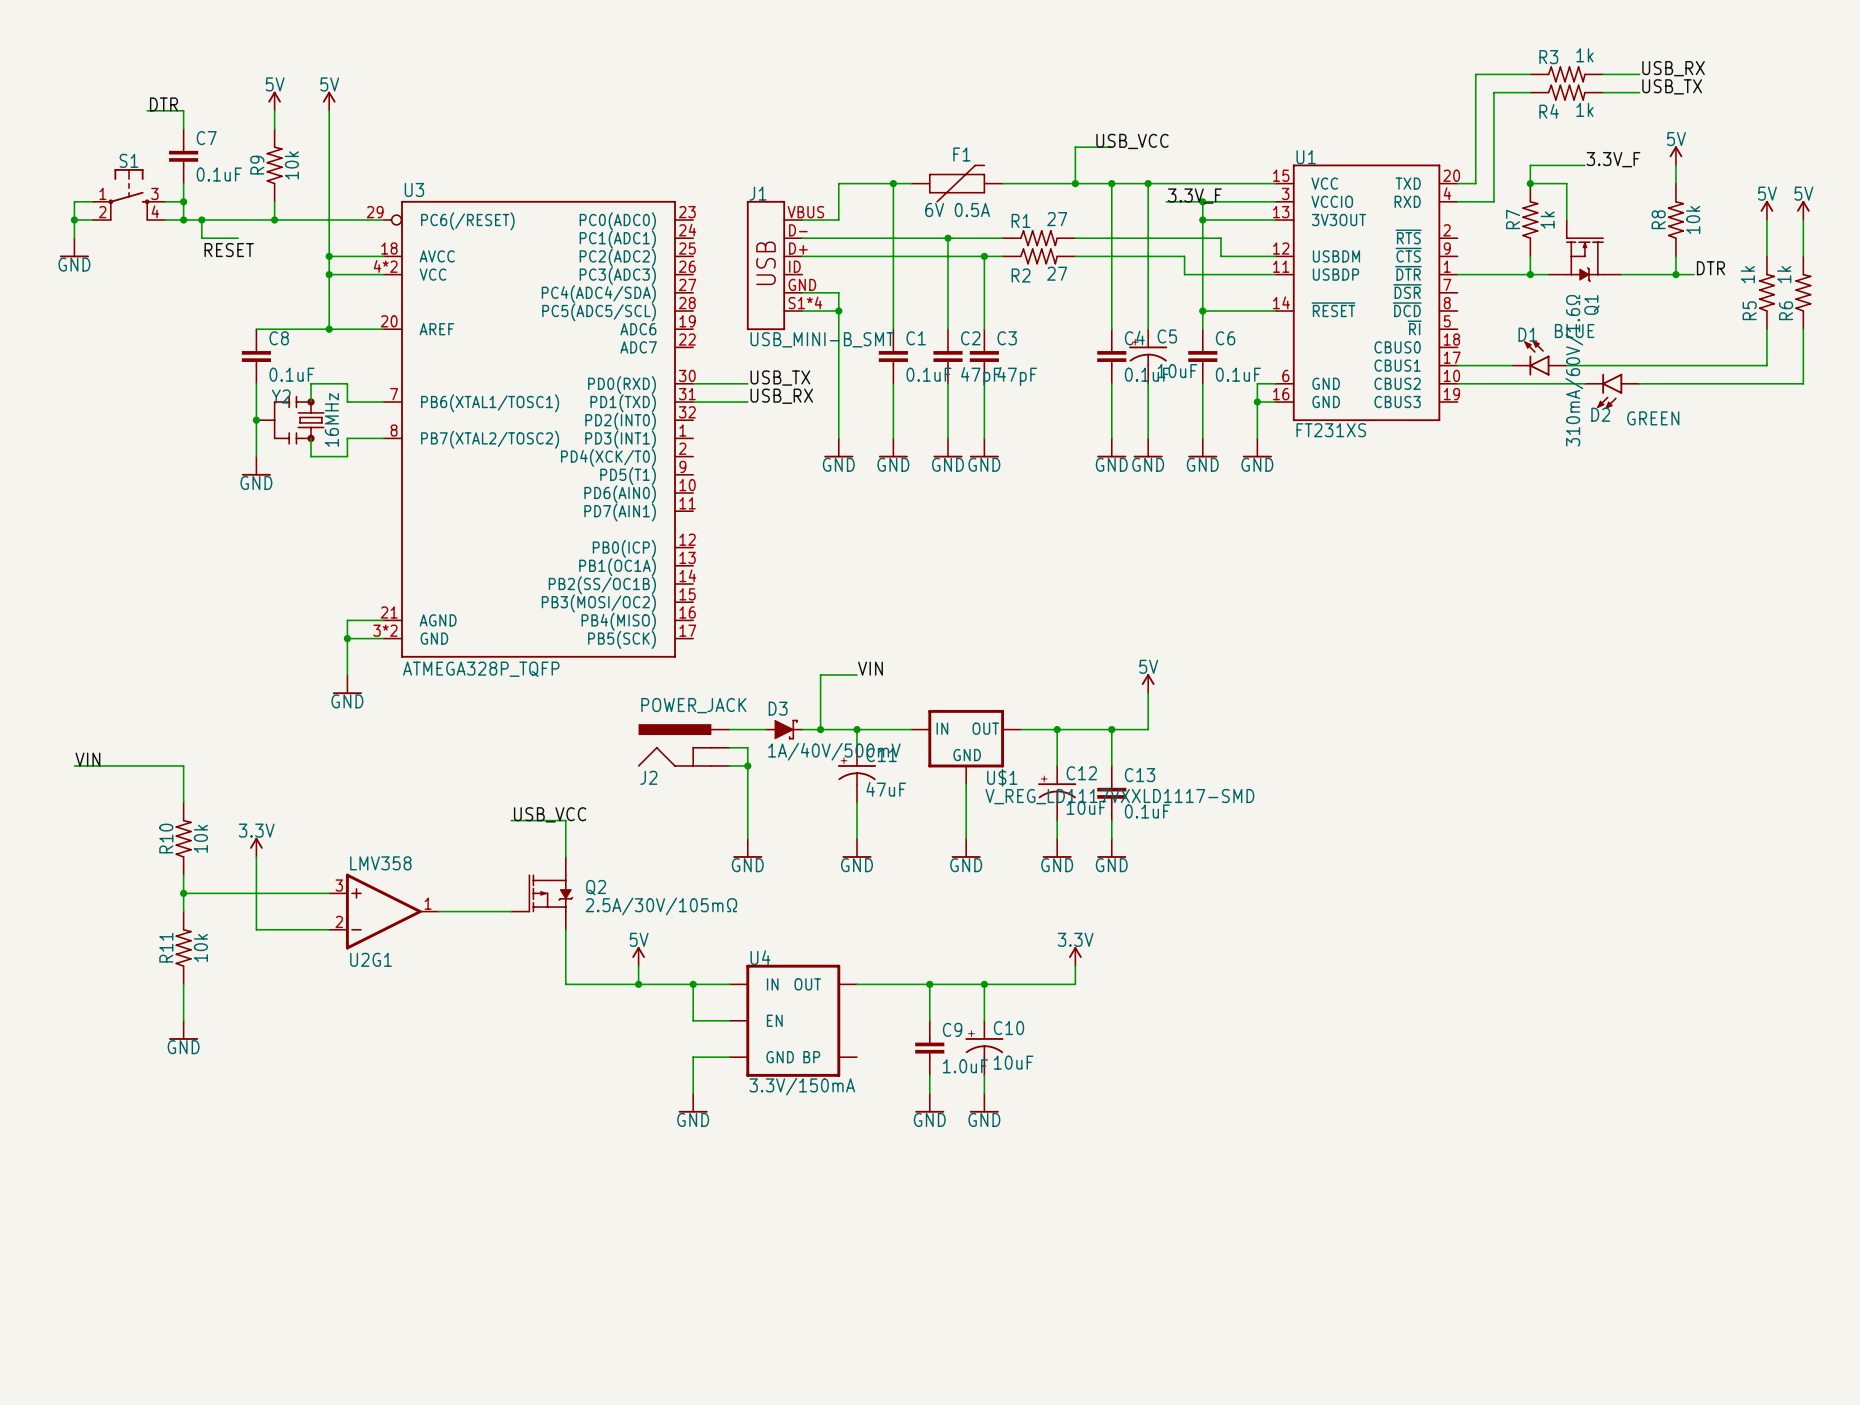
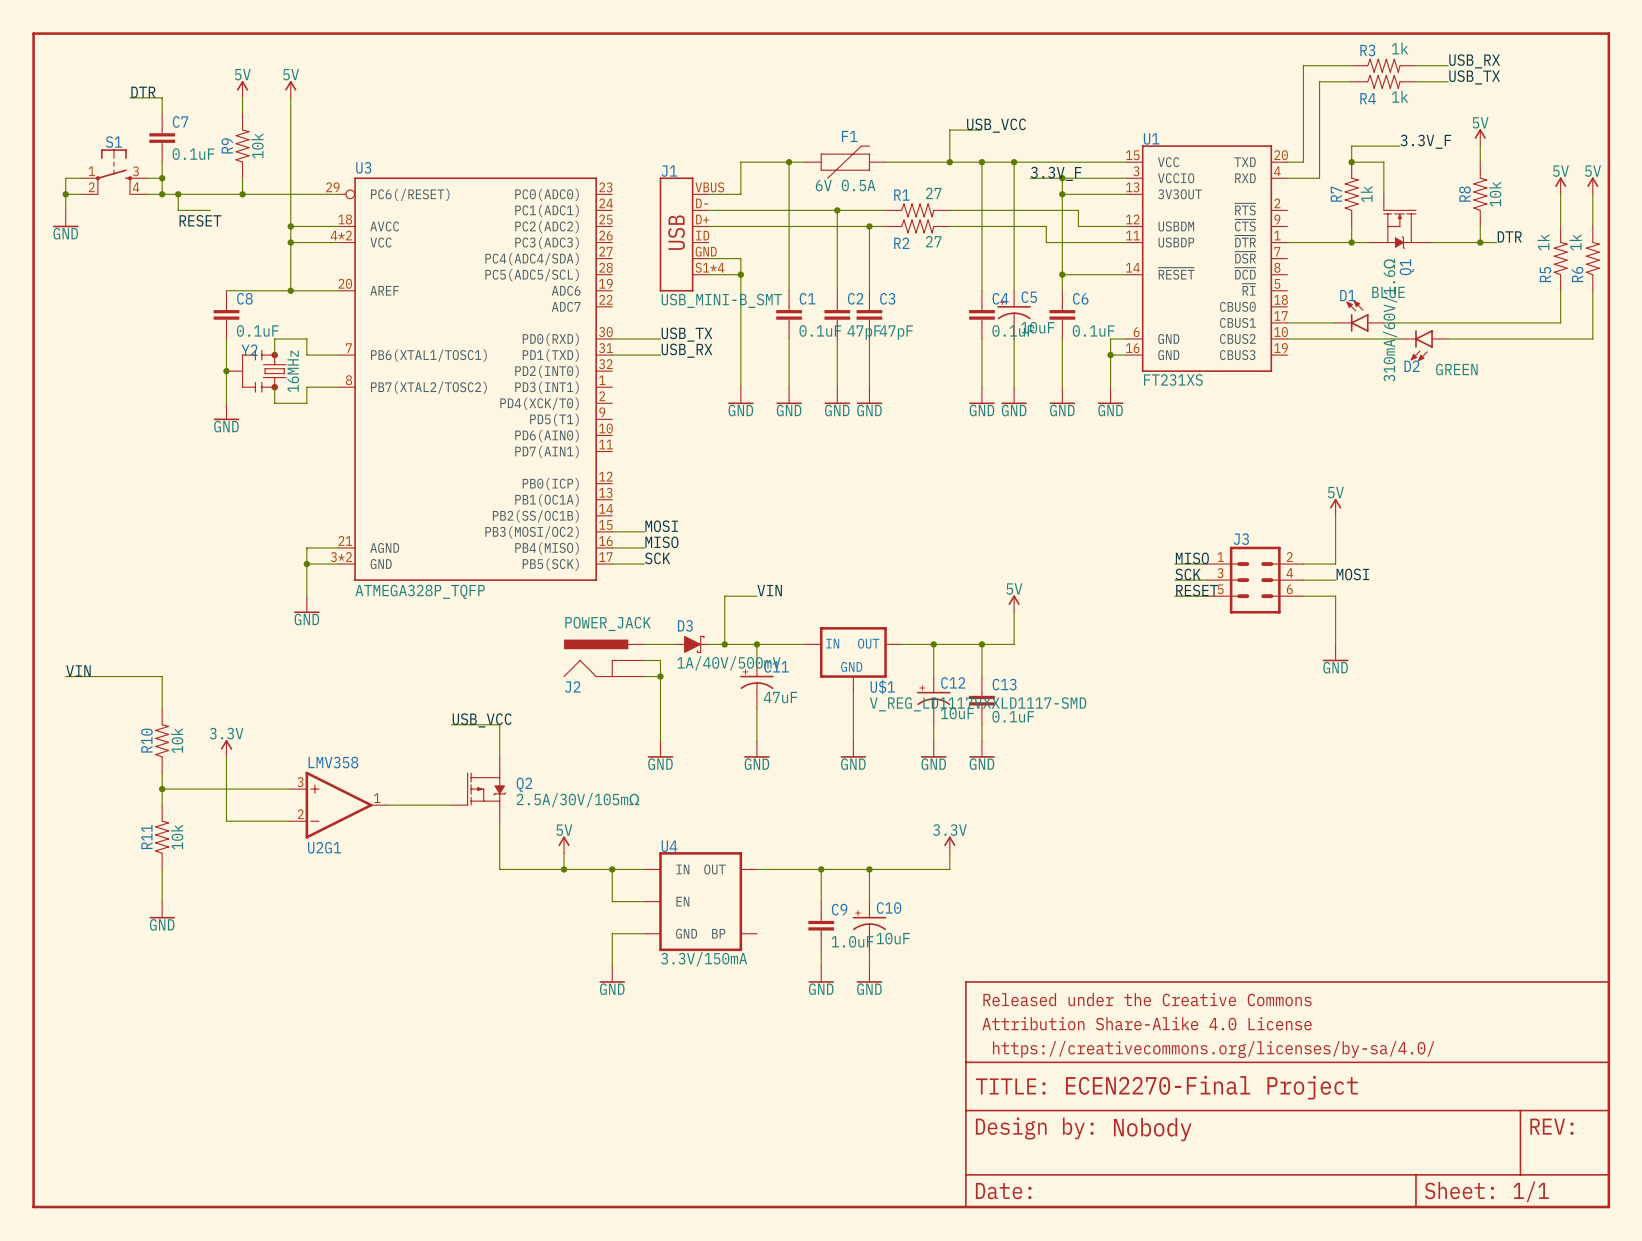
power symbol: none -> 5V (1335, 507)
wire: none -> (1335, 515) (1335, 564) (1303, 564)
label: none -> MOSI (661, 526)
wire: none -> (612, 531) (644, 531)
label: none -> MISO (661, 542)
wire: none -> (612, 547) (644, 547)
label: none -> SCK (657, 558)
label: none -> MISO (1192, 558)
wire: none -> (612, 564) (644, 564)
wire: none -> (1174, 564) (1207, 564)
label: none -> SCK (1188, 574)
label: none -> MOSI (1352, 574)
wire: none -> (1174, 580) (1207, 580)
J3: none -> (1255, 580)
wire: none -> (1303, 580) (1335, 580)
label: none -> RESET (1197, 590)
wire: none -> (1174, 596) (1207, 596)
wire: none -> (1303, 596) (1335, 596) (1335, 644)
part: none -> (821, 620)
power symbol: none -> GND (1335, 652)
part: none -> (1287, 1094)

